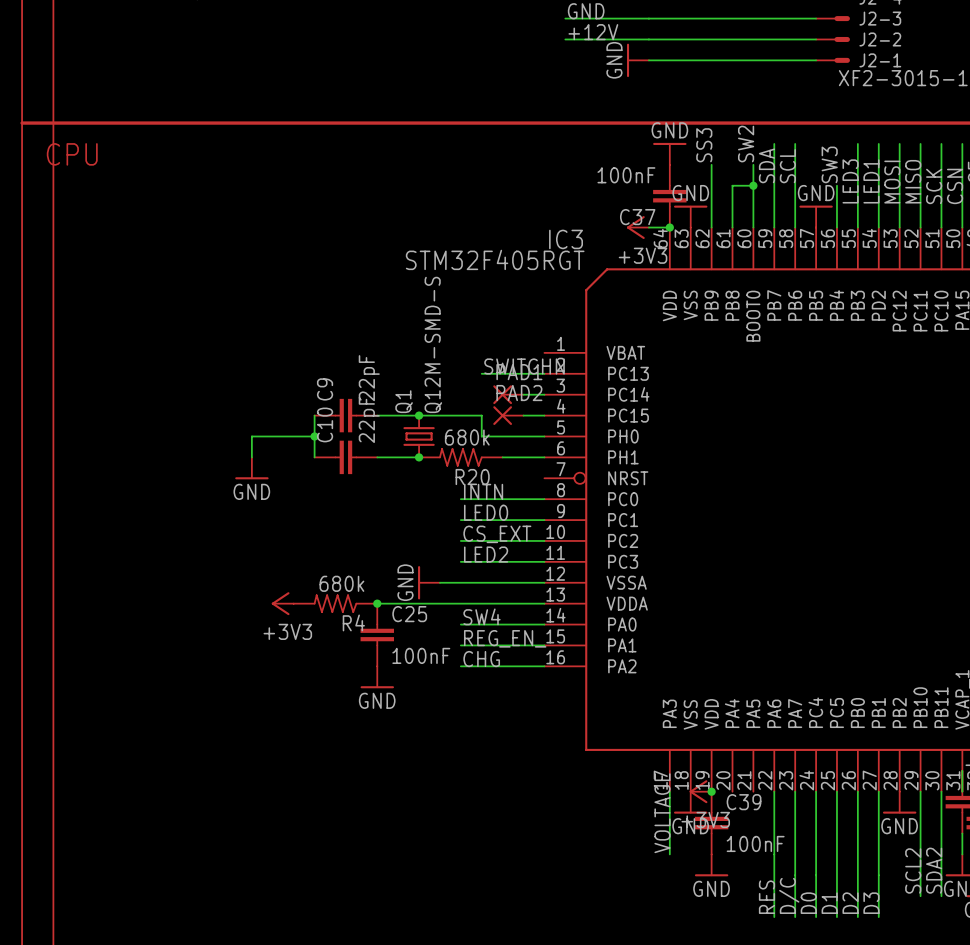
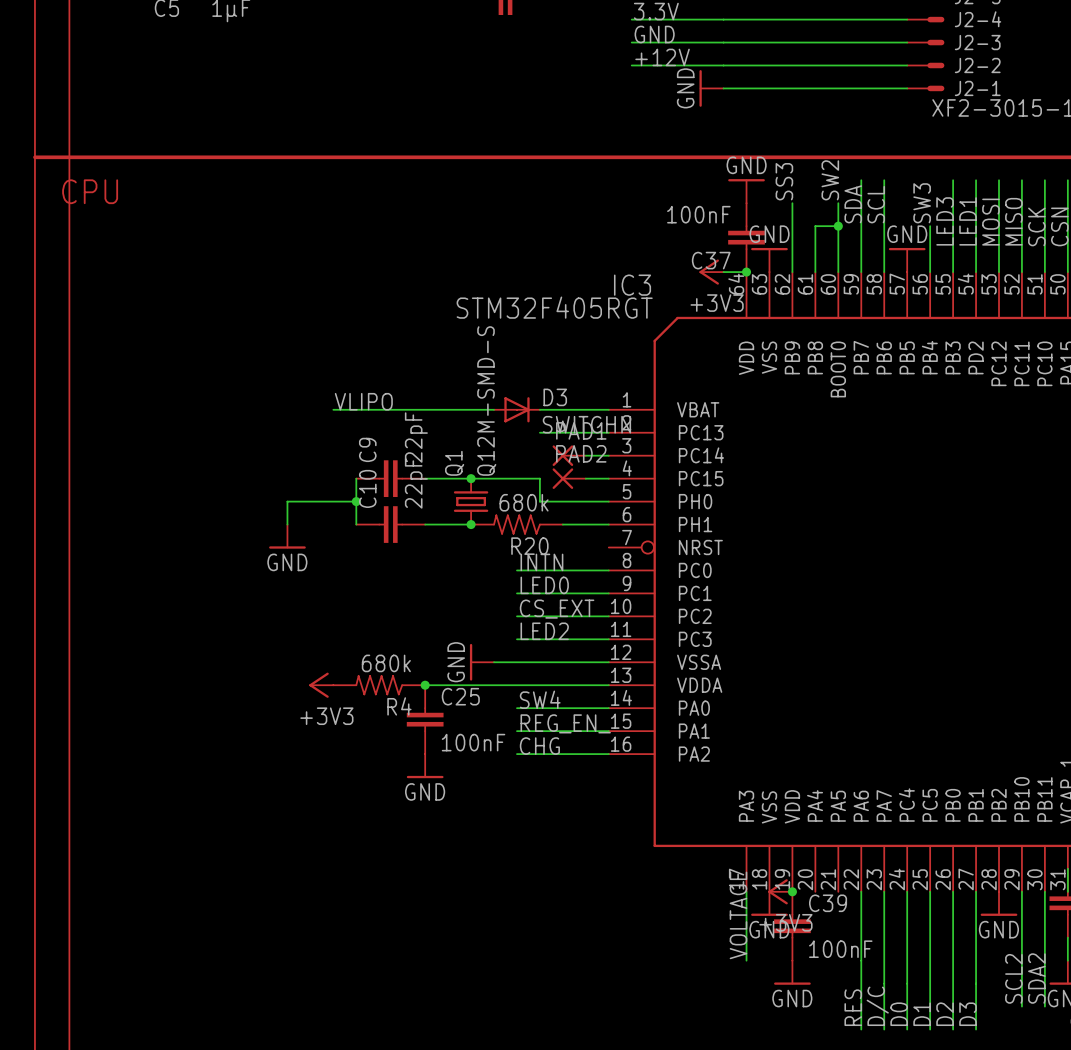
label: none -> VLIPO (363, 401)
wire: none -> (333, 409) (494, 409)
D3: none -> (516, 409)
wire: none -> (539, 409) (608, 409)

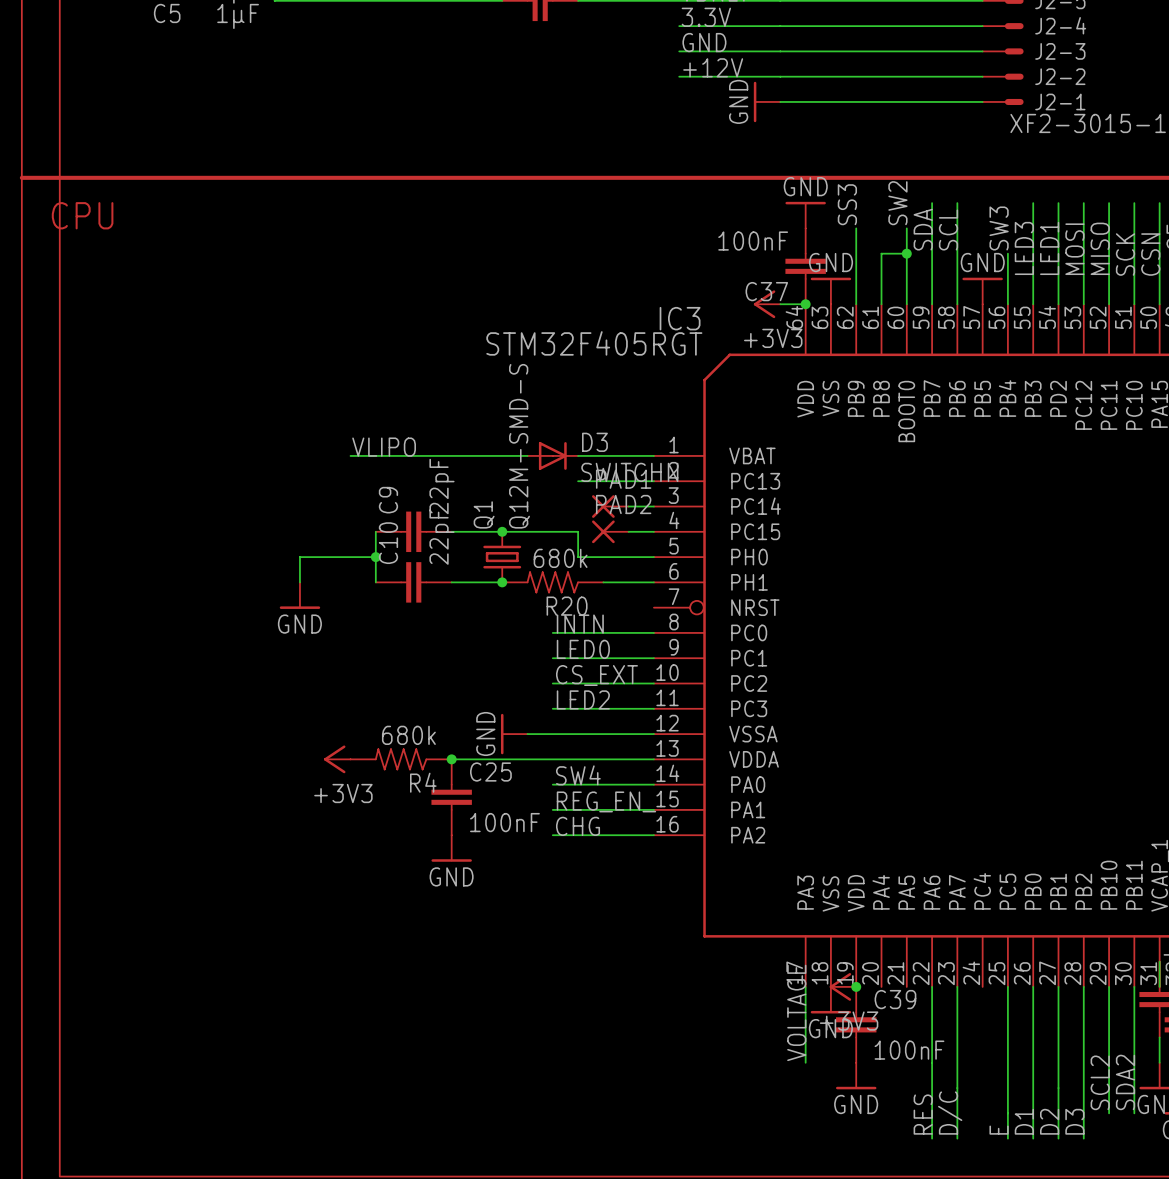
wire: (907, 891) (907, 1029) -> (1083, 986) (1083, 1138)
power symbol: GND (999, 903) -> none
label: D0 (899, 1014) -> none
label: D1 (922, 1014) -> E (999, 1130)
label: D2 (945, 1014) -> D1 (1024, 1121)
label: D3 (968, 1014) -> D2 (1049, 1121)
label: none -> D3 (1074, 1121)

